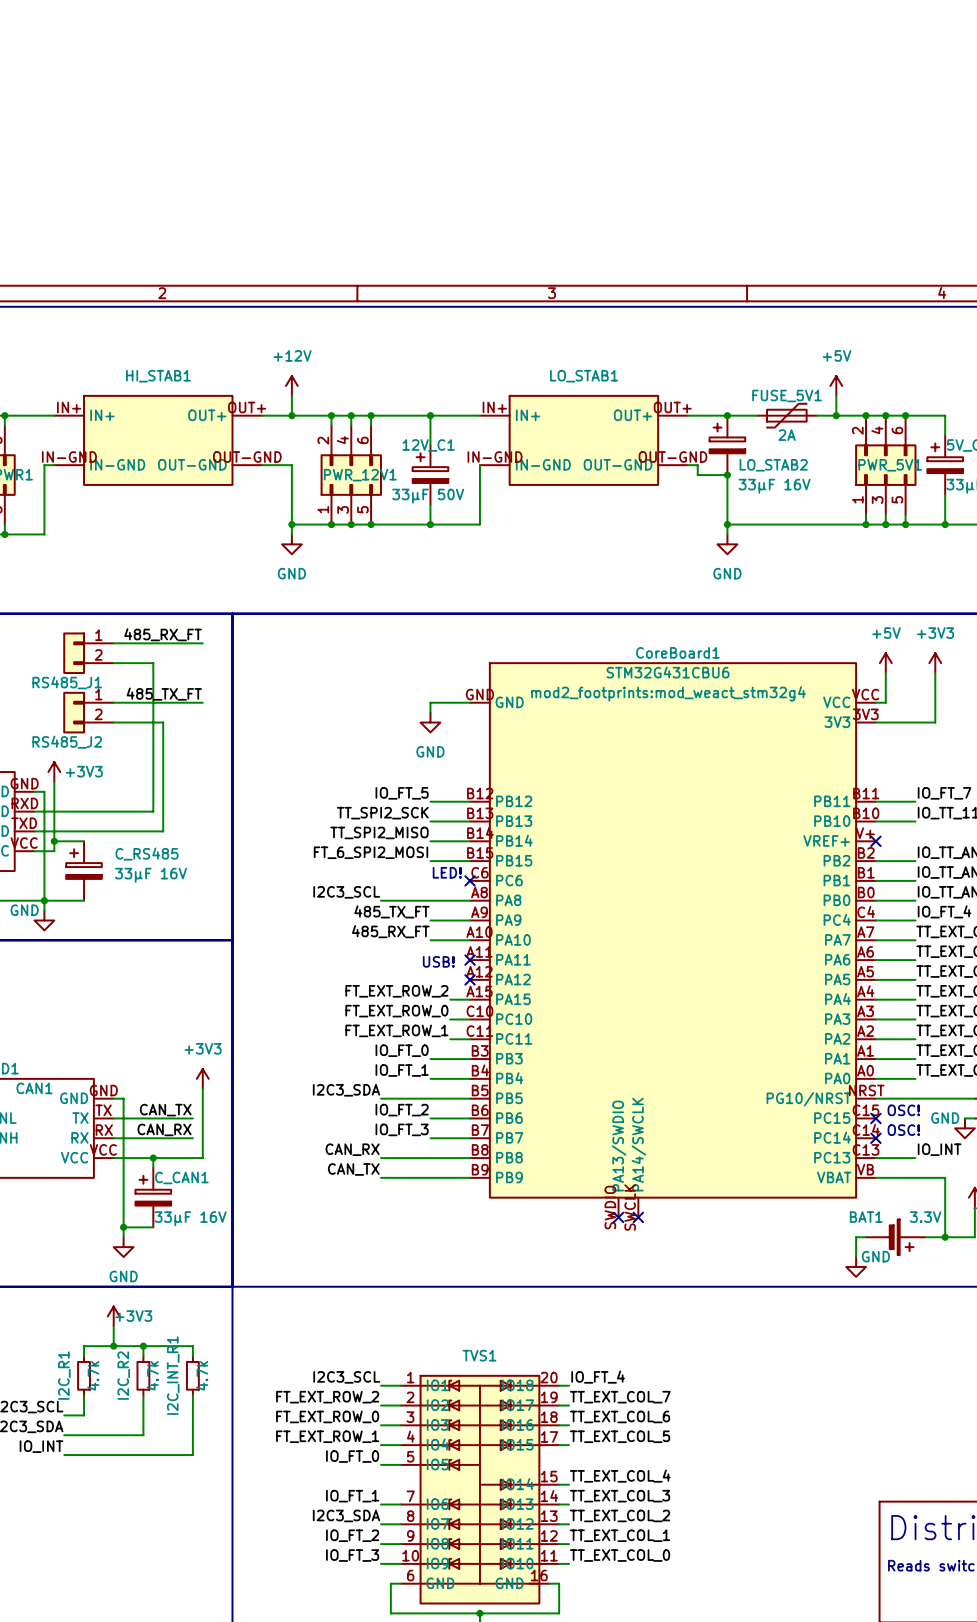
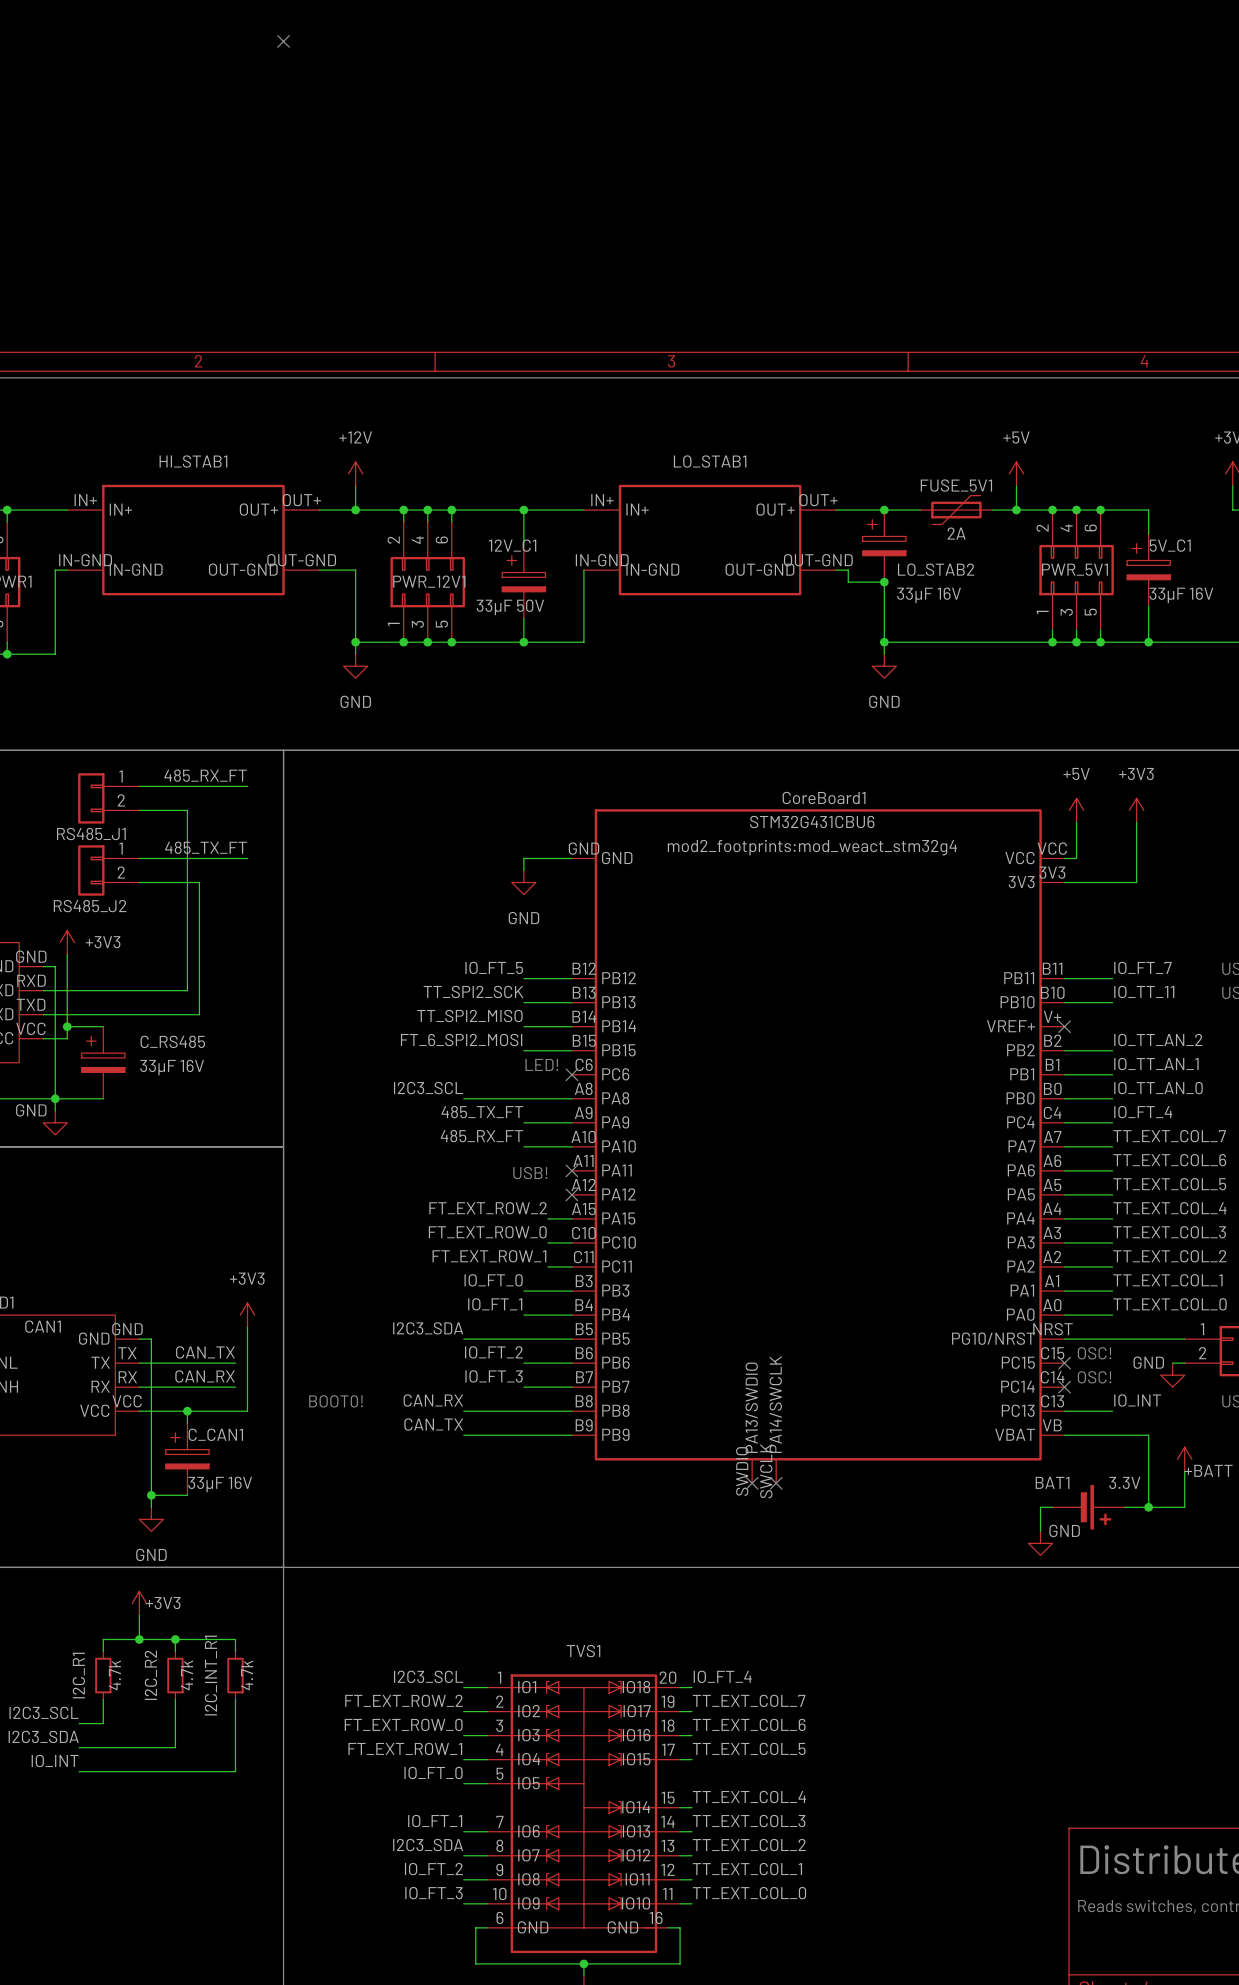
no-connect mark: none -> (283, 41)
text: none -> BOOT0! (336, 1401)

